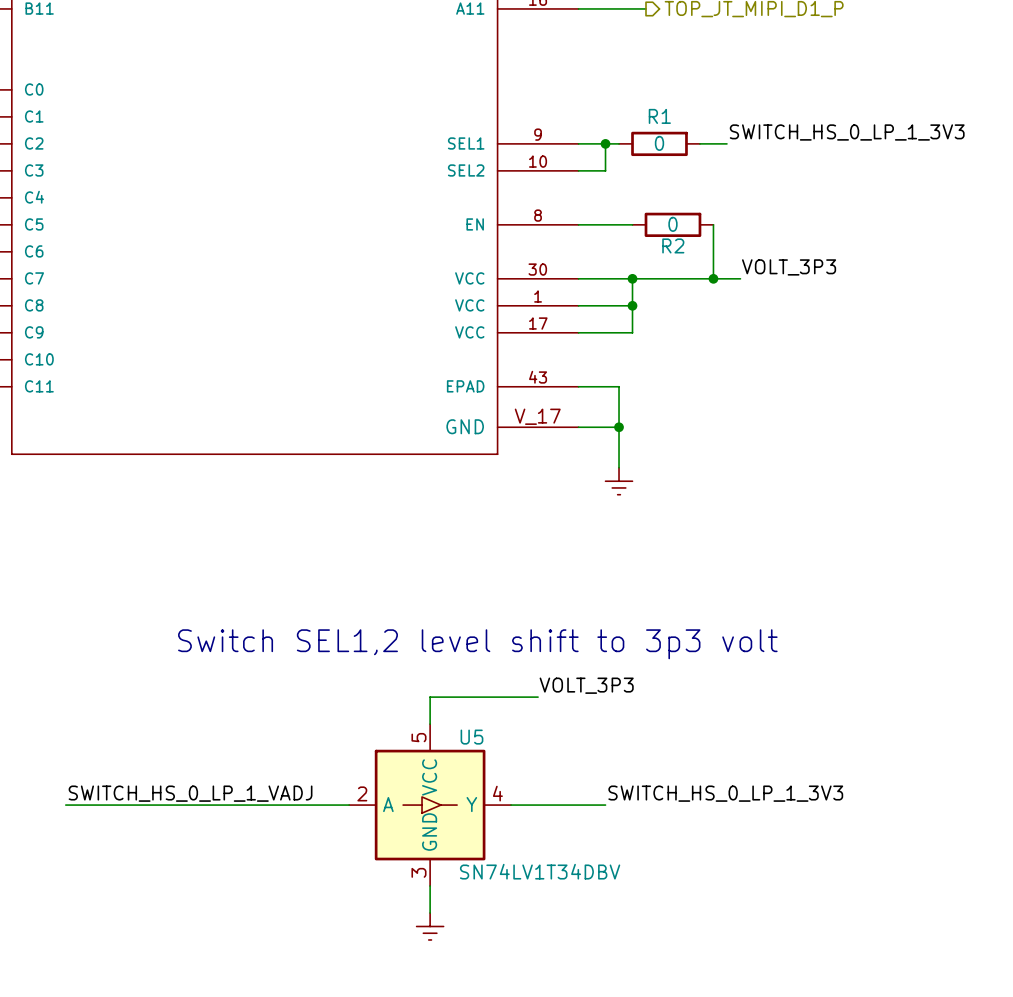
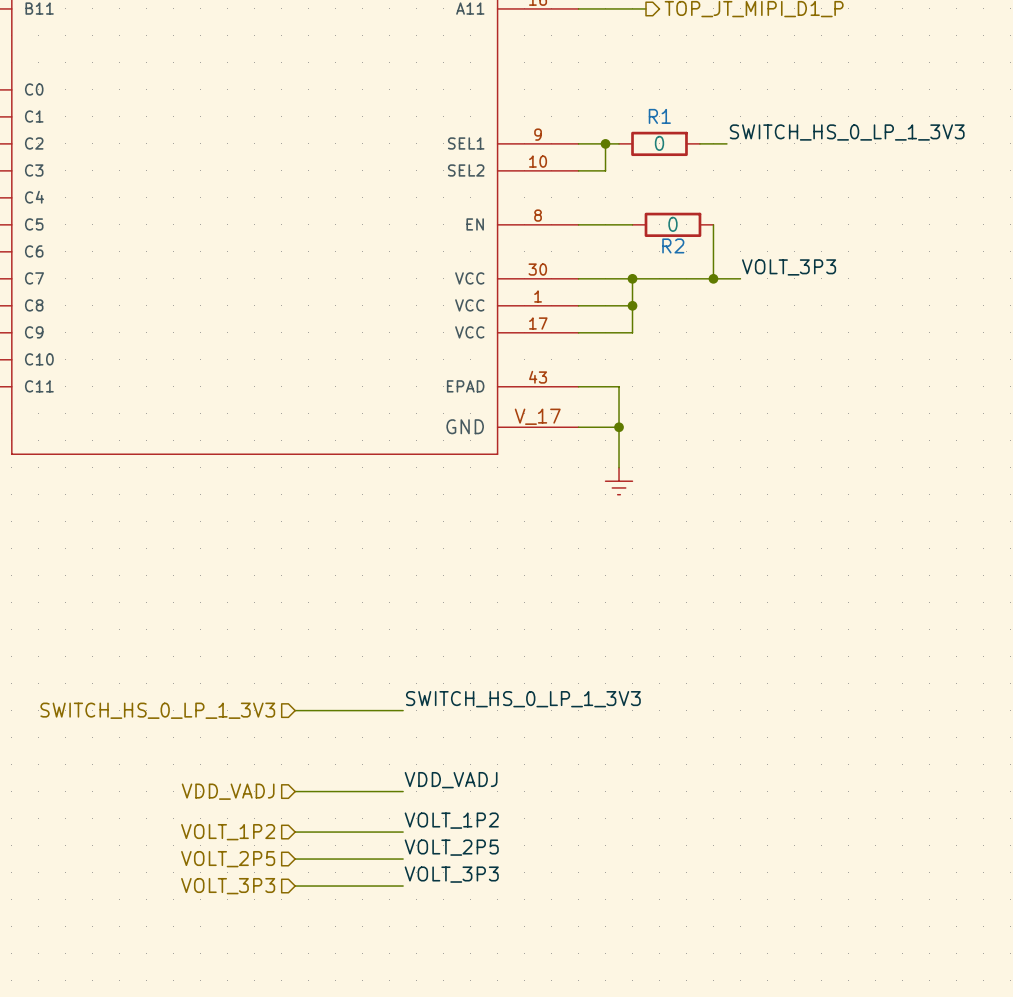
text: Switch SEL1,2 level shift to 3p3 volt (477, 644) -> none
label position: VOLT_3P3 (586, 685) -> VOLT_3P3 (451, 874)
wire: (538, 697) (430, 697) (430, 724) -> none
hierarchical label: none -> SWITCH_HS_0_LP_1_3V3 (157, 710)
wire: none -> (295, 710) (403, 710)
label: none -> VDD_VADJ (451, 780)
hierarchical label: none -> VDD_VADJ (228, 791)
wire: none -> (295, 791) (403, 791)
label: SWITCH_HS_0_LP_1_VADJ (190, 793) -> none
label position: SWITCH_HS_0_LP_1_3V3 (725, 793) -> SWITCH_HS_0_LP_1_3V3 (523, 699)
wire: (65, 805) (349, 805) -> none
U5: SN74LV1T34DBV (430, 805) -> none
wire: (511, 805) (605, 805) -> none
label: none -> VOLT_1P2 (451, 820)
hierarchical label: none -> VOLT_1P2 (228, 832)
wire: none -> (295, 832) (403, 832)
label: none -> VOLT_2P5 (451, 847)
hierarchical label: none -> VOLT_2P5 (228, 859)
wire: none -> (295, 859) (403, 859)
hierarchical label: none -> VOLT_3P3 (228, 886)
wire: none -> (295, 886) (403, 886)
wire: (430, 886) (430, 913) -> none
power symbol: (430, 926) -> none

